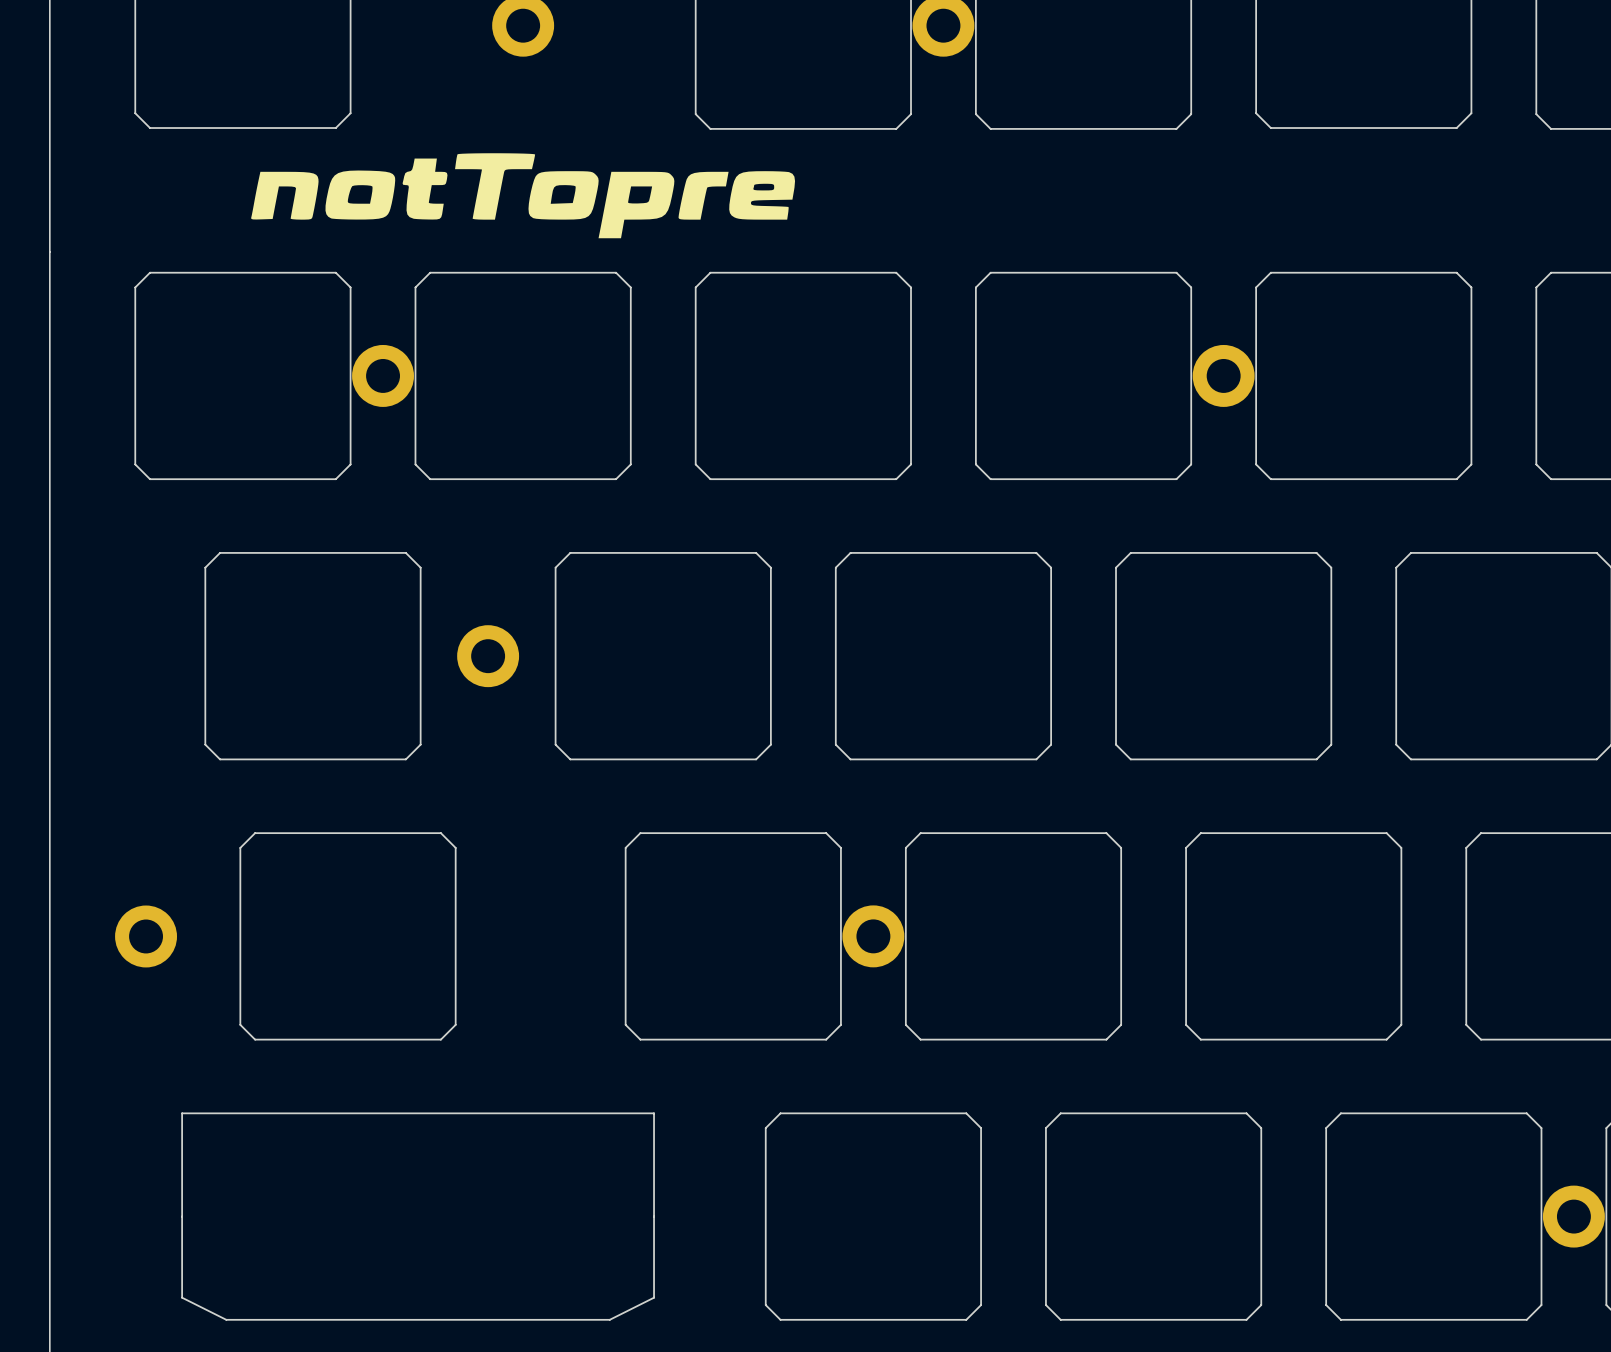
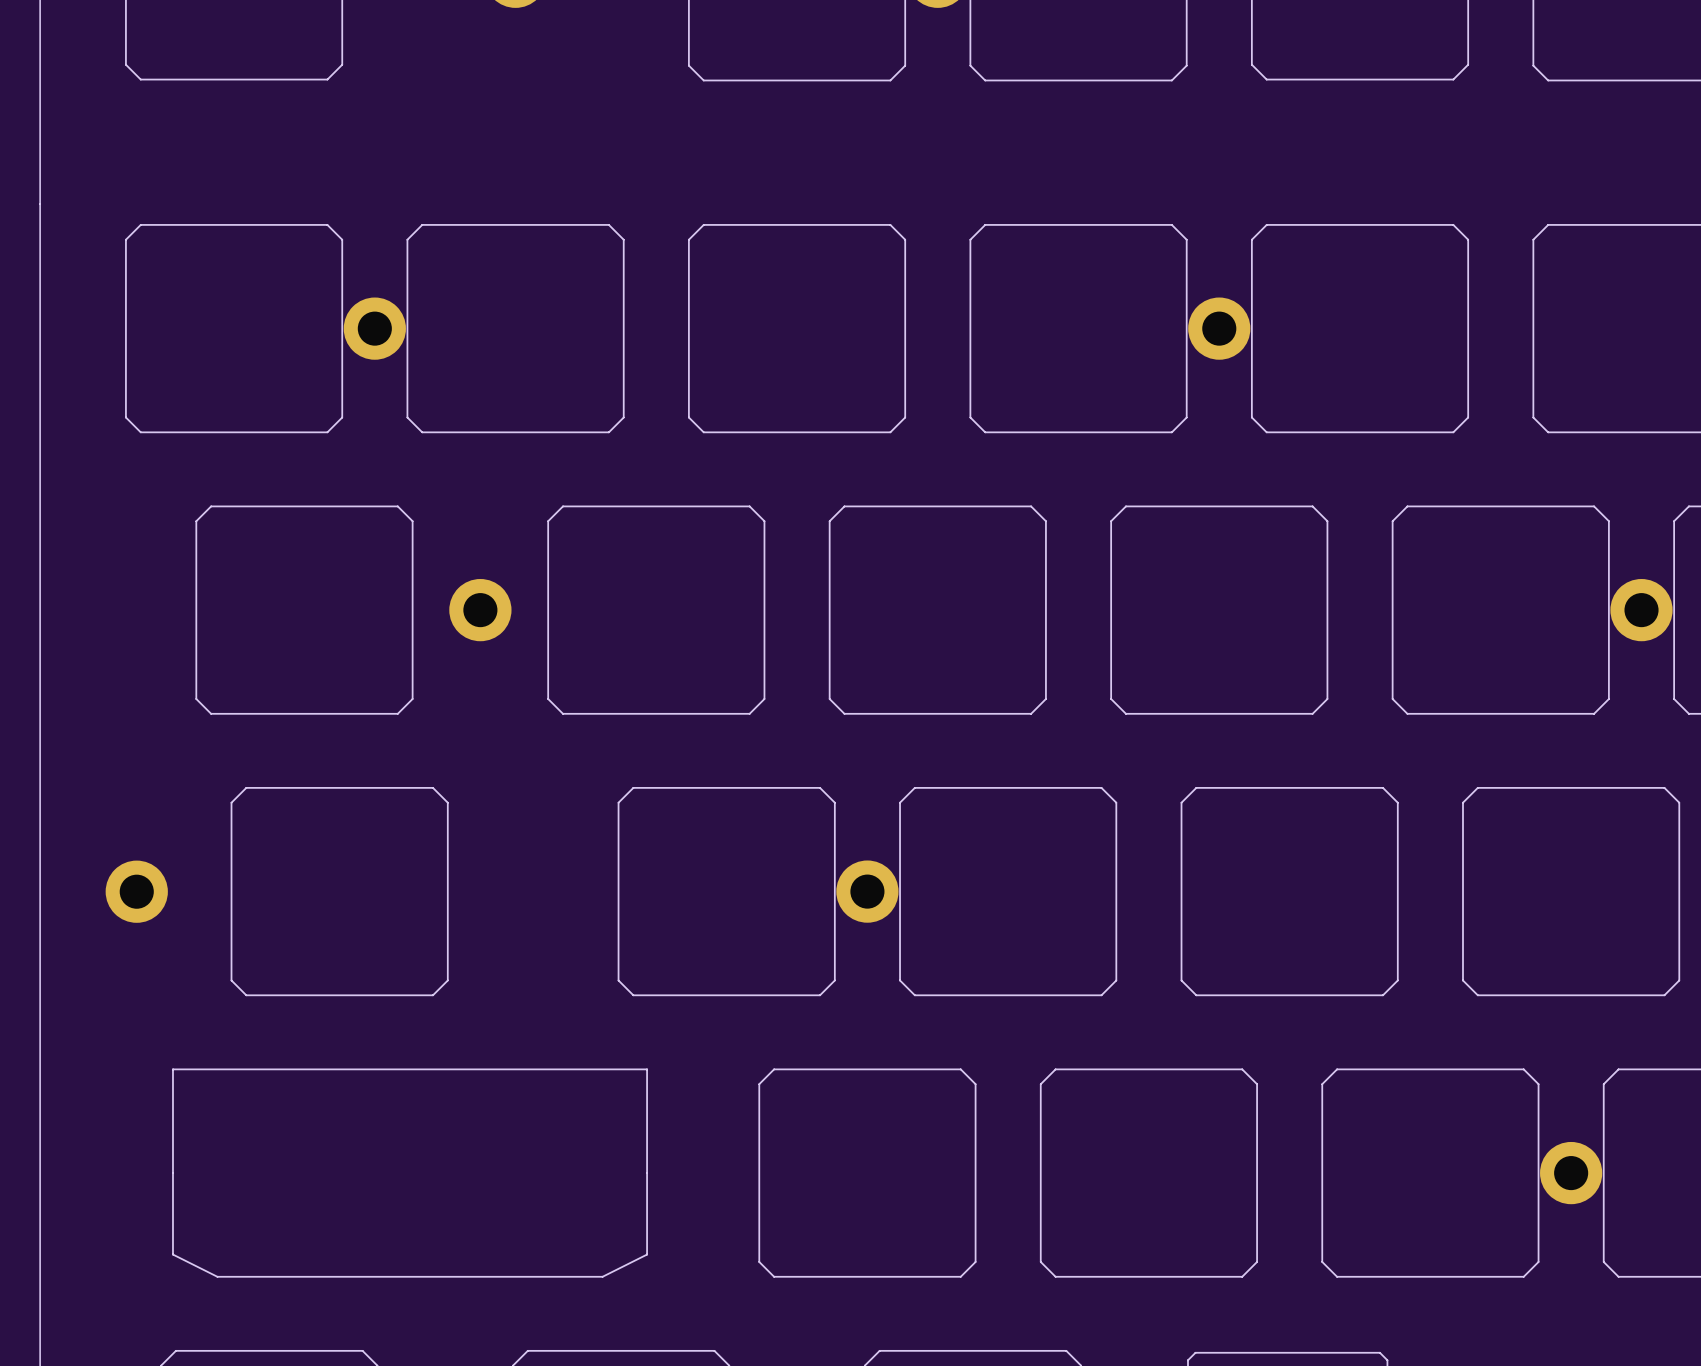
drawing: [251, 153, 796, 239] -> none

